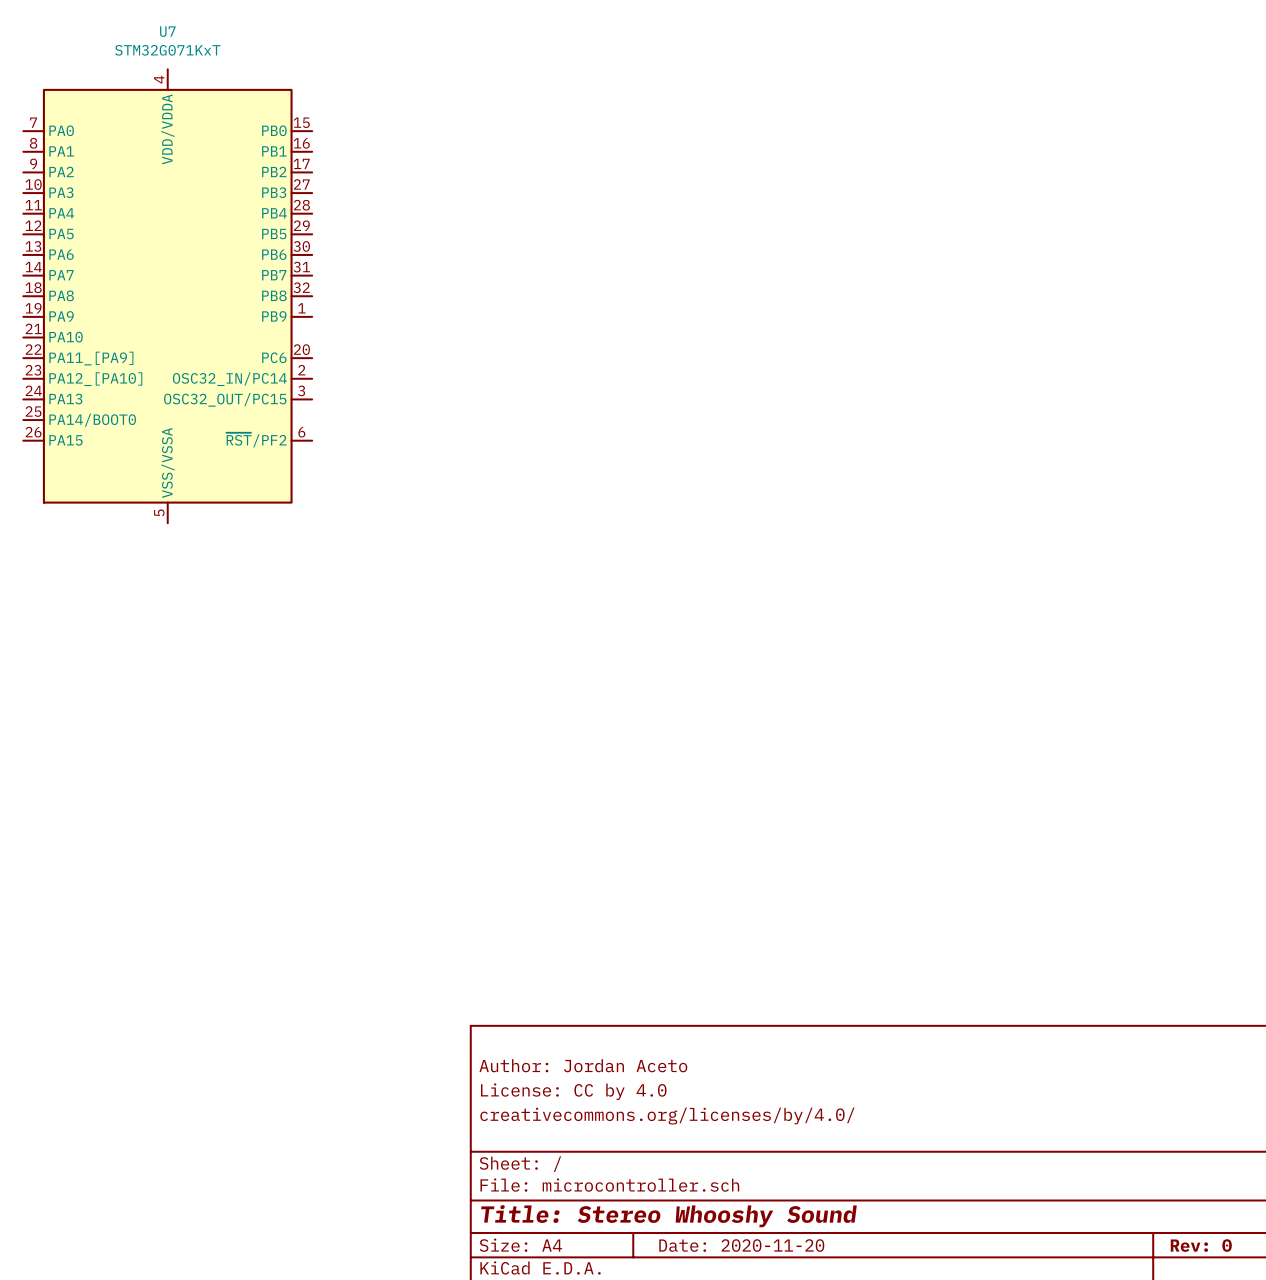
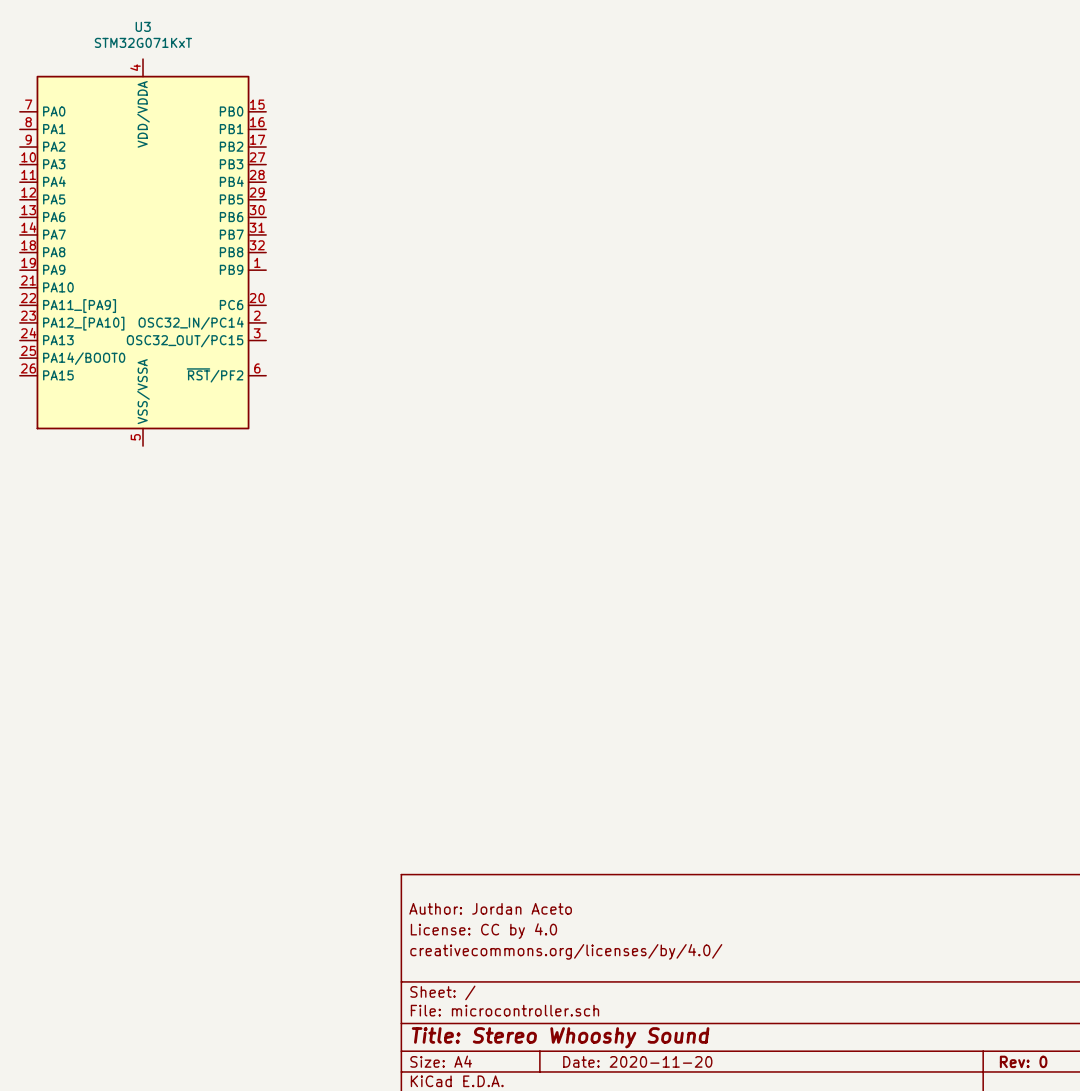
U7 name: U7 (167, 31) -> U3 (143, 26)

